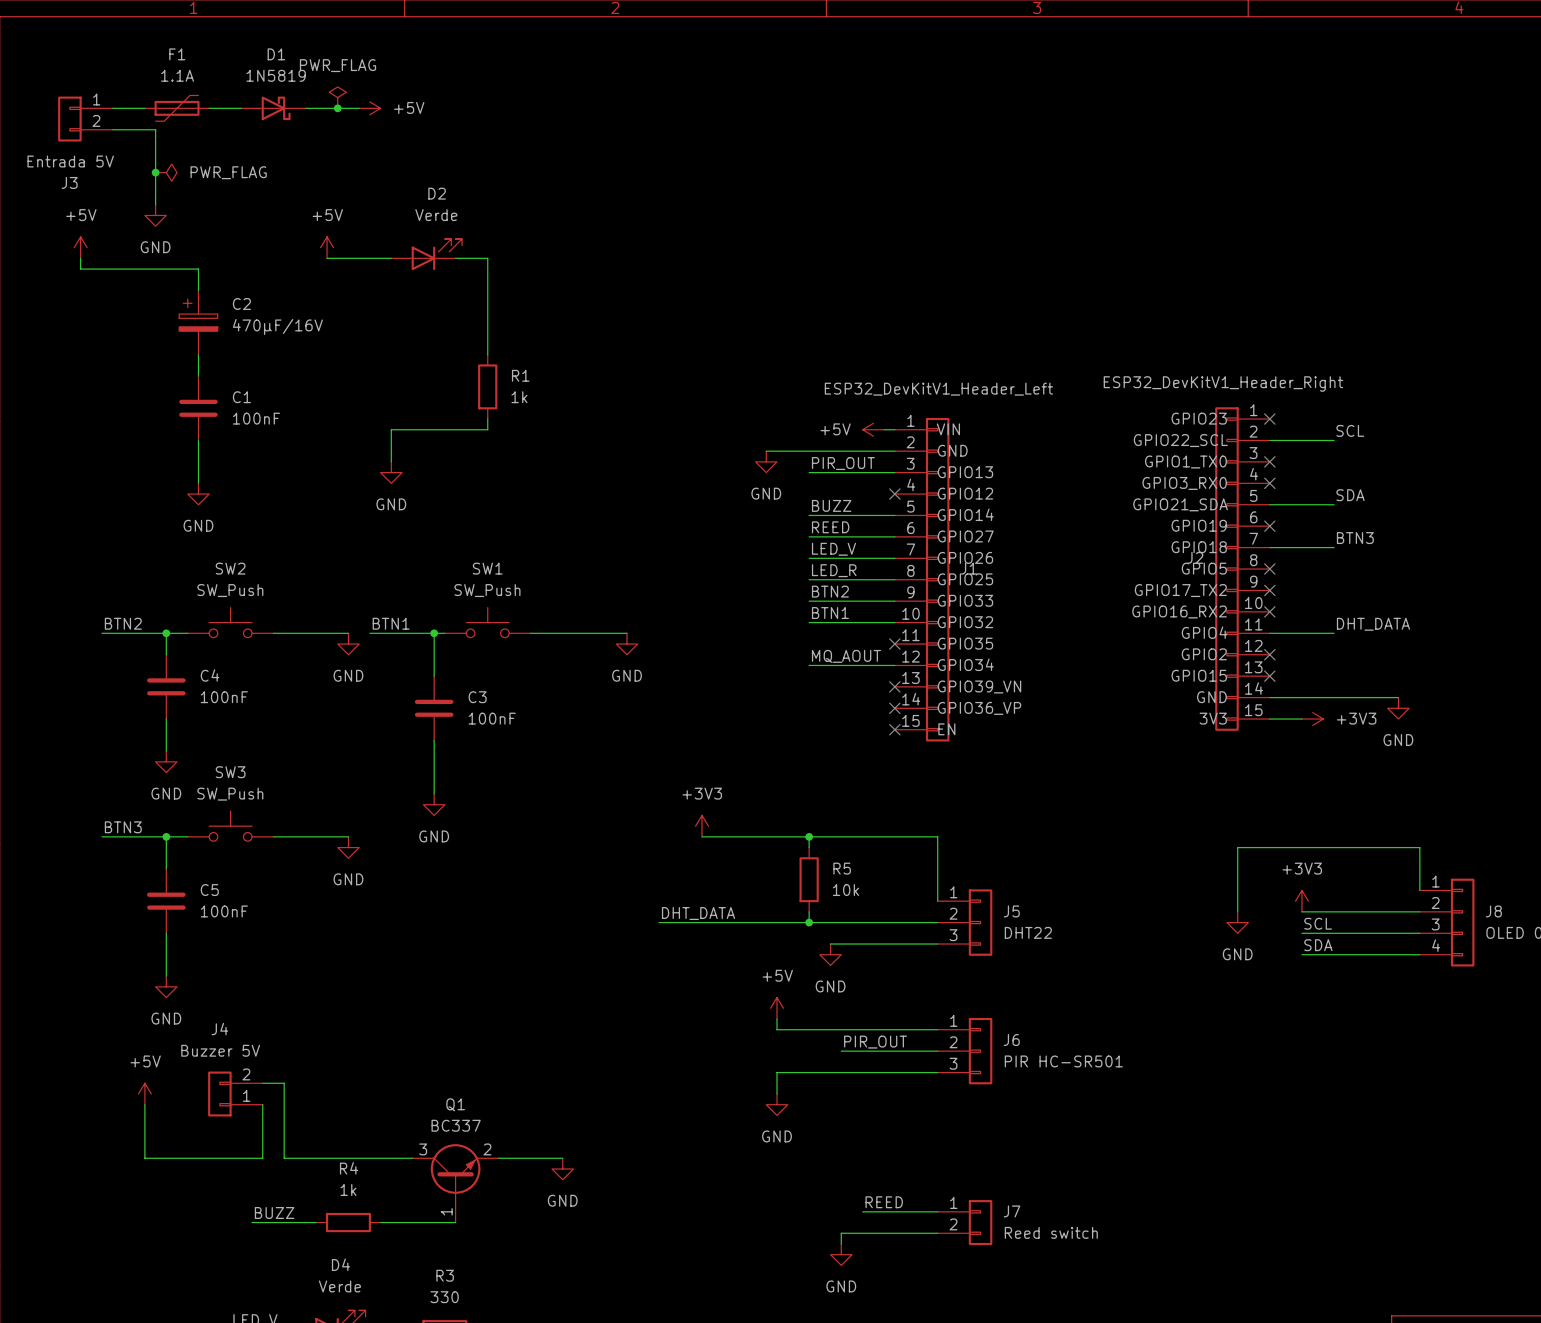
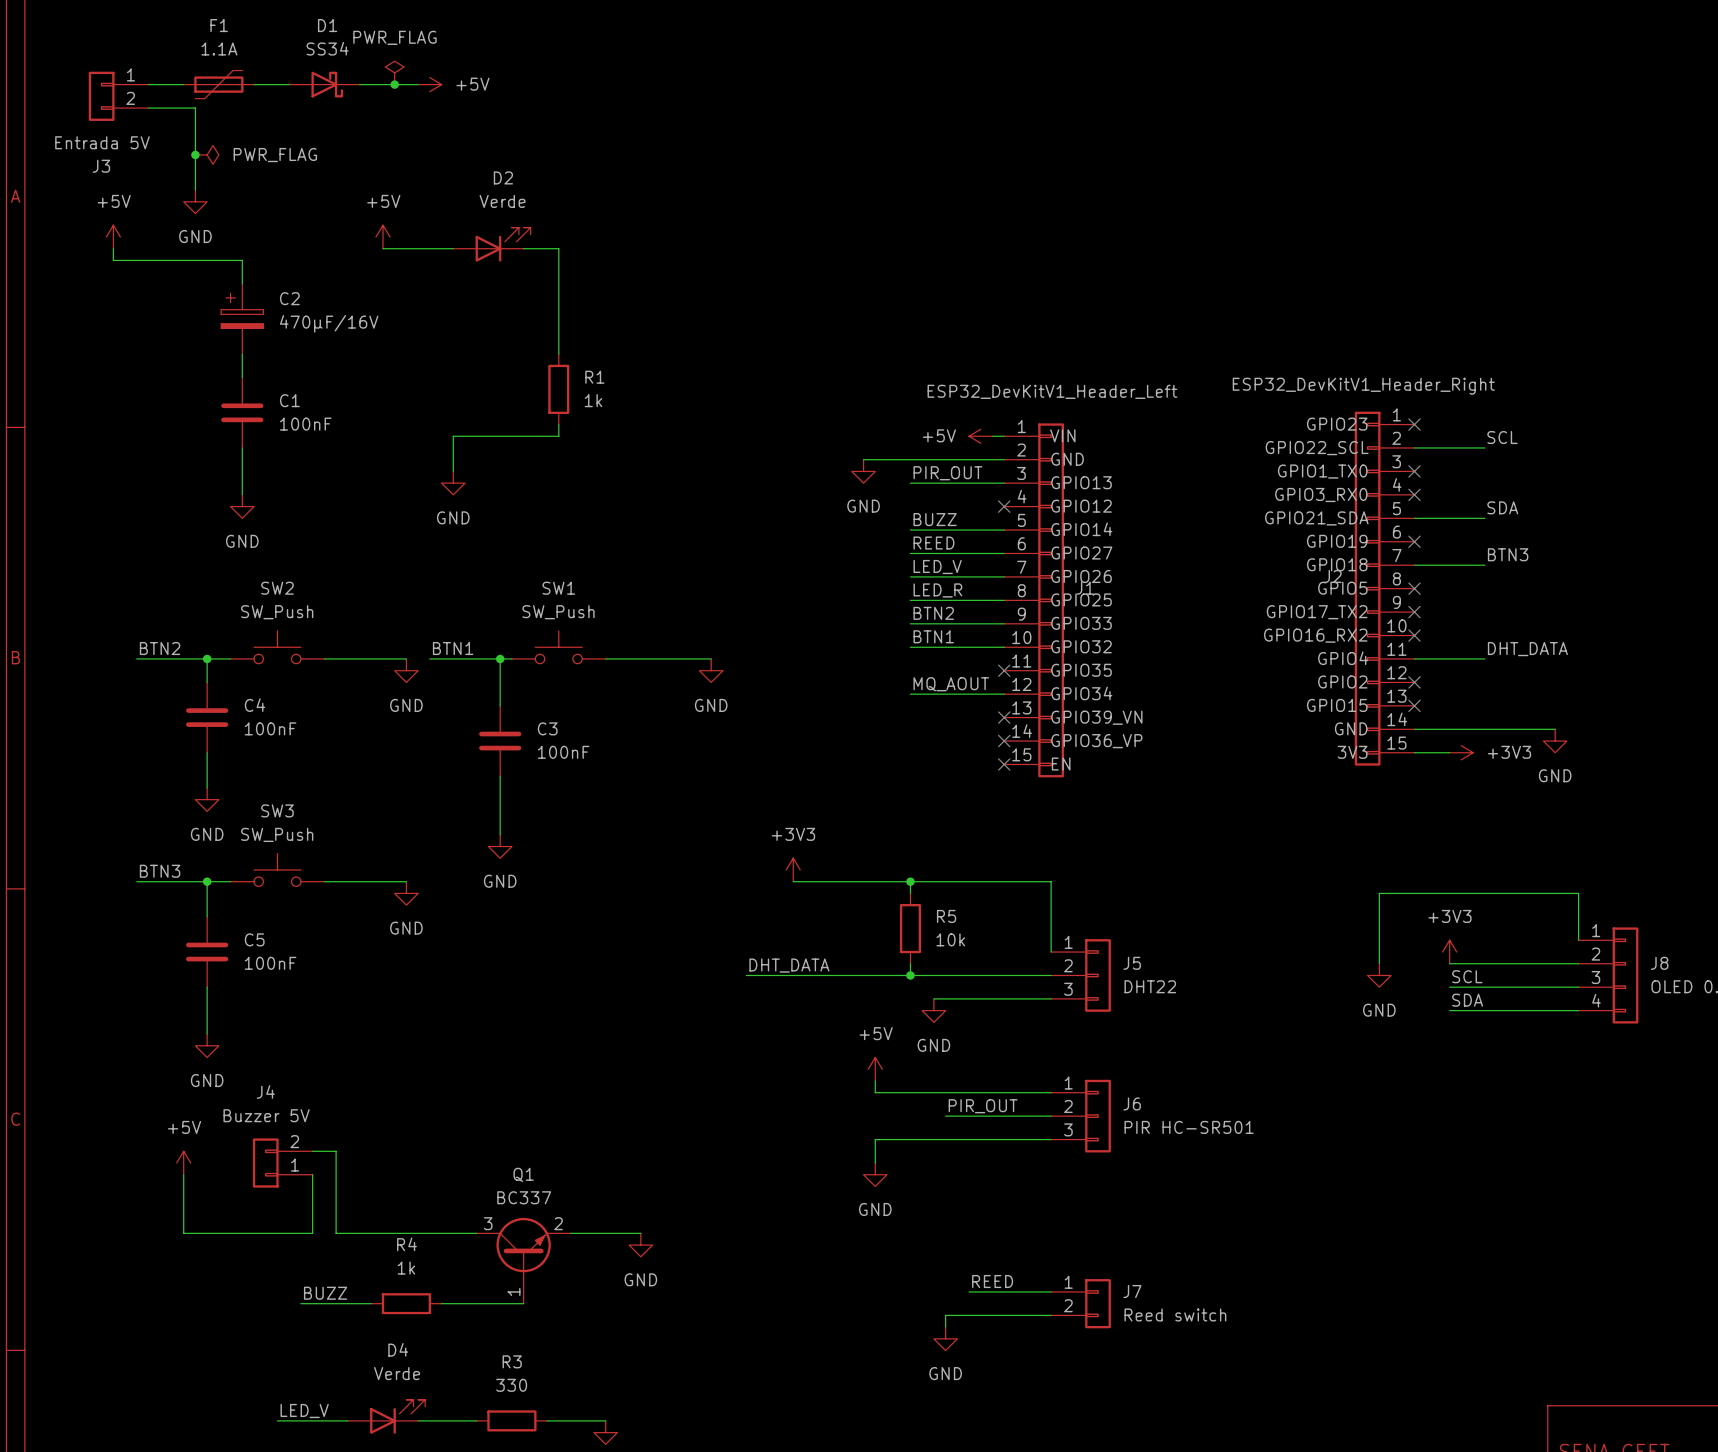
D1 value: 1N5819 (276, 75) -> SS34 (327, 48)

